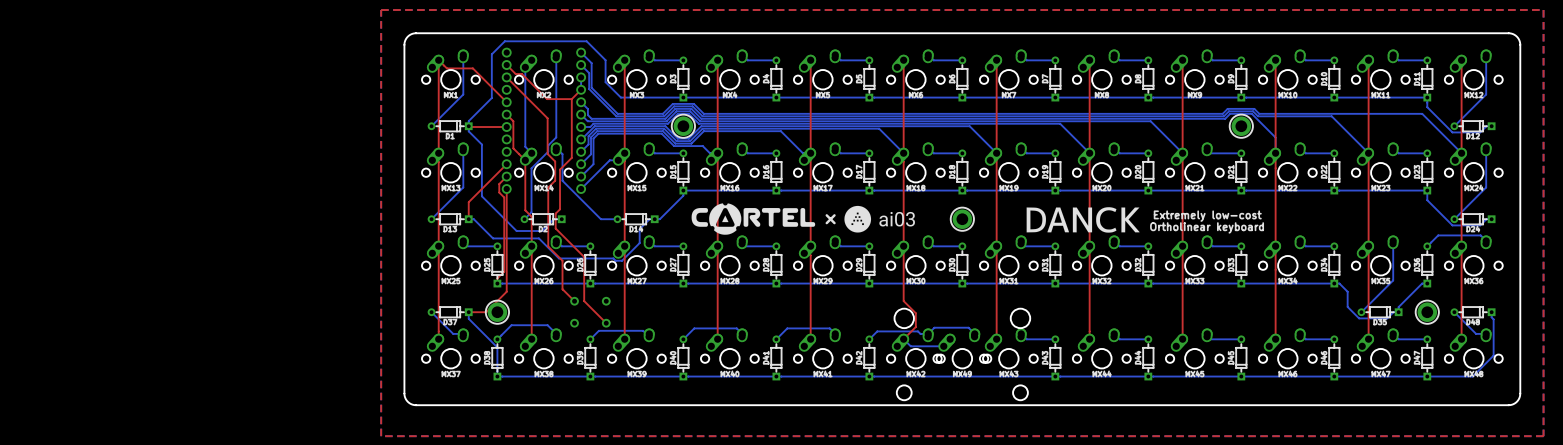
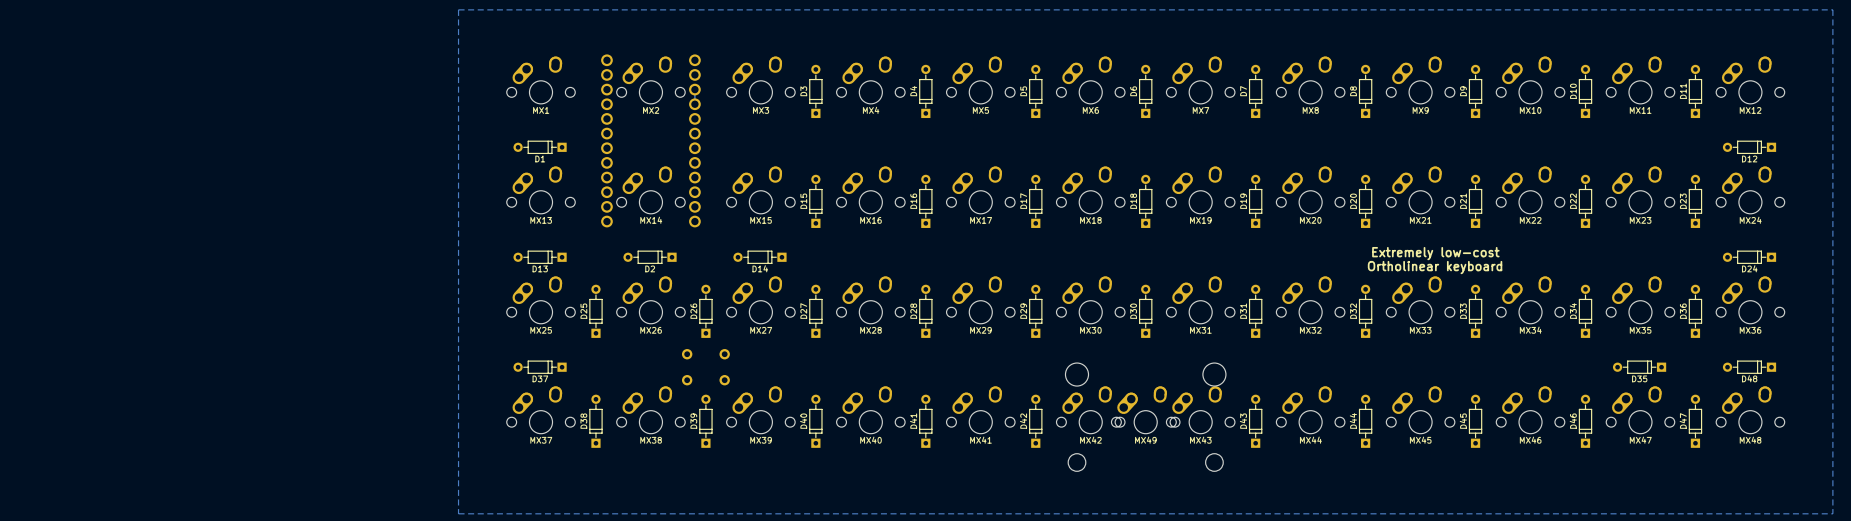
top zone outline: (381, 10) (1543, 10) (1543, 436) (381, 436) (381, 10) -> none
board edge: (416, 33) (1511, 33) (1517, 37) (1520, 44) (1519, 396) (1515, 402) (1508, 405) (413, 404) (406, 400) (404, 393) (404, 44) (407, 36) (416, 33) -> none
bottom track: (581, 52) (591, 63) (591, 87) (617, 113) (662, 113) (672, 103) (693, 103) (703, 113) (1222, 113) (1227, 108) (1254, 108) (1259, 113) (1422, 113) (1461, 153) -> none
bottom track: (463, 54) (463, 94) (431, 126) -> none
bottom track: (556, 54) (556, 137) (548, 145) (548, 151) (531, 168) (531, 212) (524, 219) -> none
bottom track: (649, 54) (654, 60) (683, 60) -> none
bottom track: (742, 54) (747, 60) (776, 60) -> none
bottom track: (835, 54) (840, 60) (869, 60) -> none
bottom track: (928, 54) (933, 60) (962, 60) -> none
bottom track: (1021, 54) (1026, 60) (1055, 60) -> none
bottom track: (1114, 54) (1119, 60) (1148, 60) -> none
bottom track: (1207, 54) (1212, 60) (1241, 60) -> none
bottom track: (1300, 54) (1305, 60) (1334, 60) -> none
bottom track: (1393, 54) (1398, 60) (1427, 60) -> none
bottom track: (1486, 54) (1486, 94) (1454, 126) -> none
top track: (624, 60) (624, 339) -> none
top track: (717, 60) (717, 339) -> none
top track: (810, 60) (810, 246) (804, 253) (810, 255) (810, 339) -> none
top track: (903, 60) (903, 153) (897, 160) (903, 161) (903, 301) (915, 313) (915, 326) (903, 339) -> none
top track: (996, 60) (996, 339) -> none
top track: (1089, 60) (1089, 339) -> none
top track: (1182, 60) (1182, 339) -> none
top track: (1275, 60) (1275, 339) -> none
top track: (1368, 60) (1368, 339) (1362, 346) -> none
top track: (1461, 60) (1461, 339) -> none
top track: (506, 65) (515, 74) (521, 74) (547, 99) (571, 99) -> none
bottom track: (581, 65) (589, 73) (589, 89) (616, 116) (664, 116) (674, 106) (692, 106) (702, 116) (1223, 116) (1228, 111) (1253, 111) (1258, 116) (1331, 116) (1368, 153) -> none
bottom track: (525, 67) (525, 146) (531, 153) -> none
top track: (506, 77) (547, 118) (547, 153) (555, 161) (555, 180) (548, 187) (548, 246) (562, 260) (562, 289) (574, 301) -> none
top track: (581, 89) (571, 99) -> none
top track: (571, 99) (571, 157) (560, 169) (560, 209) (555, 213) (555, 228) (584, 257) (584, 301) (606, 323) -> none
top track: (506, 102) (472, 68) (446, 68) (438, 60) (438, 153) (432, 160) (438, 161) (438, 339) -> none
bottom track: (581, 102) (587, 109) (587, 115) (591, 118) (665, 118) (675, 108) (691, 108) (701, 118) (1225, 118) (1230, 113) (1251, 113) (1275, 137) (1275, 153) -> none
top track: (506, 114) (513, 121) (513, 148) (525, 160) (525, 210) (531, 216) (531, 339) -> none
bottom track: (581, 114) (587, 121) (666, 121) (676, 111) (690, 111) (700, 121) (1150, 121) (1182, 153) -> none
drawing: [671, 114, 696, 139] -> none
drawing: [1229, 114, 1254, 139] -> none
top track: (468, 126) (506, 127) -> none
part: (683, 126) -> none
part: (1241, 126) -> none
bottom track: (1491, 126) (1486, 126) (1480, 132) (1452, 132) (1427, 107) (1427, 97) (620, 97) (605, 82) (605, 60) (586, 41) (504, 41) (491, 54) (491, 98) (468, 121) (468, 131) (481, 144) (481, 196) (516, 231) (542, 231) (553, 219) (561, 219) -> none
bottom track: (581, 127) (590, 127) (593, 123) (667, 123) (677, 113) (688, 113) (698, 123) (1060, 123) (1089, 153) -> none
bottom track: (581, 139) (594, 126) (665, 126) (677, 138) (688, 138) (701, 126) (969, 126) (996, 153) -> none
bottom track: (463, 147) (463, 187) (431, 219) -> none
bottom track: (556, 147) (562, 154) (562, 180) (600, 219) (617, 219) -> none
bottom track: (649, 147) (654, 153) (683, 153) -> none
bottom track: (742, 147) (747, 153) (776, 153) -> none
bottom track: (835, 147) (840, 153) (869, 153) -> none
bottom track: (928, 147) (933, 153) (962, 153) -> none
bottom track: (1021, 147) (1026, 153) (1055, 153) -> none
bottom track: (1114, 147) (1119, 153) (1148, 153) -> none
bottom track: (1300, 147) (1305, 153) (1334, 153) -> none
bottom track: (1393, 147) (1398, 153) (1427, 153) -> none
bottom track: (1486, 147) (1486, 187) (1454, 219) -> none
bottom track: (1207, 150) (1209, 153) (1241, 153) -> none
bottom track: (581, 151) (588, 144) (588, 136) (595, 128) (664, 128) (676, 141) (690, 141) (702, 128) (879, 128) (903, 153) -> none
bottom track: (717, 153) (709, 153) (702, 146) (674, 146) (661, 133) (598, 133) (593, 138) (593, 164) (581, 176) -> none
bottom track: (810, 153) (802, 153) (780, 131) (703, 131) (691, 143) (675, 143) (662, 131) (597, 131) (591, 137) (591, 154) (581, 164) -> none
bottom track: (618, 160) (609, 160) (581, 189) -> none
top track: (506, 164) (468, 202) (468, 219) -> none
top track: (506, 176) (499, 184) (499, 192) (504, 197) (504, 271) (497, 278) (497, 283) -> none
top track: (506, 189) (506, 291) (486, 312) (468, 312) -> none
drawing: [691, 203, 816, 235] -> none
drawing: [844, 205, 915, 233] -> none
drawing: [950, 207, 975, 232] -> none
drawing: [1026, 207, 1140, 233] -> none
line: (826, 215) (834, 223) -> none
line: (834, 215) (826, 223) -> none
bottom track: (468, 219) (473, 219) (493, 238) (538, 238) (558, 258) (613, 258) (615, 260) (622, 260) (639, 243) (639, 229) (649, 219) (659, 219) (683, 195) (683, 190) (1427, 190) (1427, 200) (1452, 225) (1480, 225) (1486, 219) (1491, 219) -> none
part: (962, 219) -> none
bottom track: (556, 240) (561, 246) (590, 246) -> none
bottom track: (649, 240) (654, 246) (683, 246) -> none
bottom track: (835, 240) (840, 246) (869, 246) -> none
bottom track: (928, 240) (933, 246) (962, 246) -> none
bottom track: (1114, 240) (1119, 246) (1148, 246) -> none
bottom track: (1207, 240) (1212, 246) (1241, 246) -> none
bottom track: (1300, 240) (1305, 246) (1334, 246) -> none
bottom track: (1393, 240) (1393, 280) (1361, 312) -> none
bottom track: (1486, 240) (1480, 235) (1438, 235) (1427, 246) -> none
bottom track: (463, 243) (465, 246) (497, 246) -> none
bottom track: (742, 243) (744, 246) (776, 246) -> none
bottom track: (1021, 243) (1023, 246) (1055, 246) -> none
bottom track: (497, 283) (1339, 283) (1347, 291) (1347, 306) (1359, 318) (1387, 318) (1393, 312) (1398, 312) (1398, 307) (1422, 283) (1427, 283) -> none
drawing: [485, 300, 510, 325] -> none
drawing: [1415, 300, 1440, 325] -> none
bottom track: (431, 312) (453, 333) (463, 333) -> none
bottom track: (468, 312) (468, 318) (497, 347) (497, 376) (1472, 376) (1493, 355) (1493, 319) (1491, 312) -> none
part: (497, 312) -> none
part: (1427, 312) -> none
bottom track: (1454, 312) (1476, 333) (1486, 333) -> none
bottom track: (556, 333) (547, 325) (511, 325) (497, 339) -> none
bottom track: (742, 333) (736, 328) (694, 328) (683, 339) -> none
bottom track: (835, 333) (829, 328) (787, 328) (776, 339) -> none
bottom track: (974, 333) (968, 327) (934, 327) (928, 333) (920, 333) (918, 331) (877, 331) (869, 339) -> none
bottom track: (1021, 333) (1026, 339) (1055, 339) -> none
bottom track: (1114, 333) (1119, 339) (1148, 339) -> none
bottom track: (1300, 333) (1305, 339) (1334, 339) -> none
bottom track: (1393, 333) (1398, 339) (1427, 339) -> none
bottom track: (649, 336) (643, 330) (598, 330) (590, 339) -> none
bottom track: (1207, 336) (1209, 339) (1241, 339) -> none
bottom track: (903, 339) (910, 346) (943, 346) -> none

